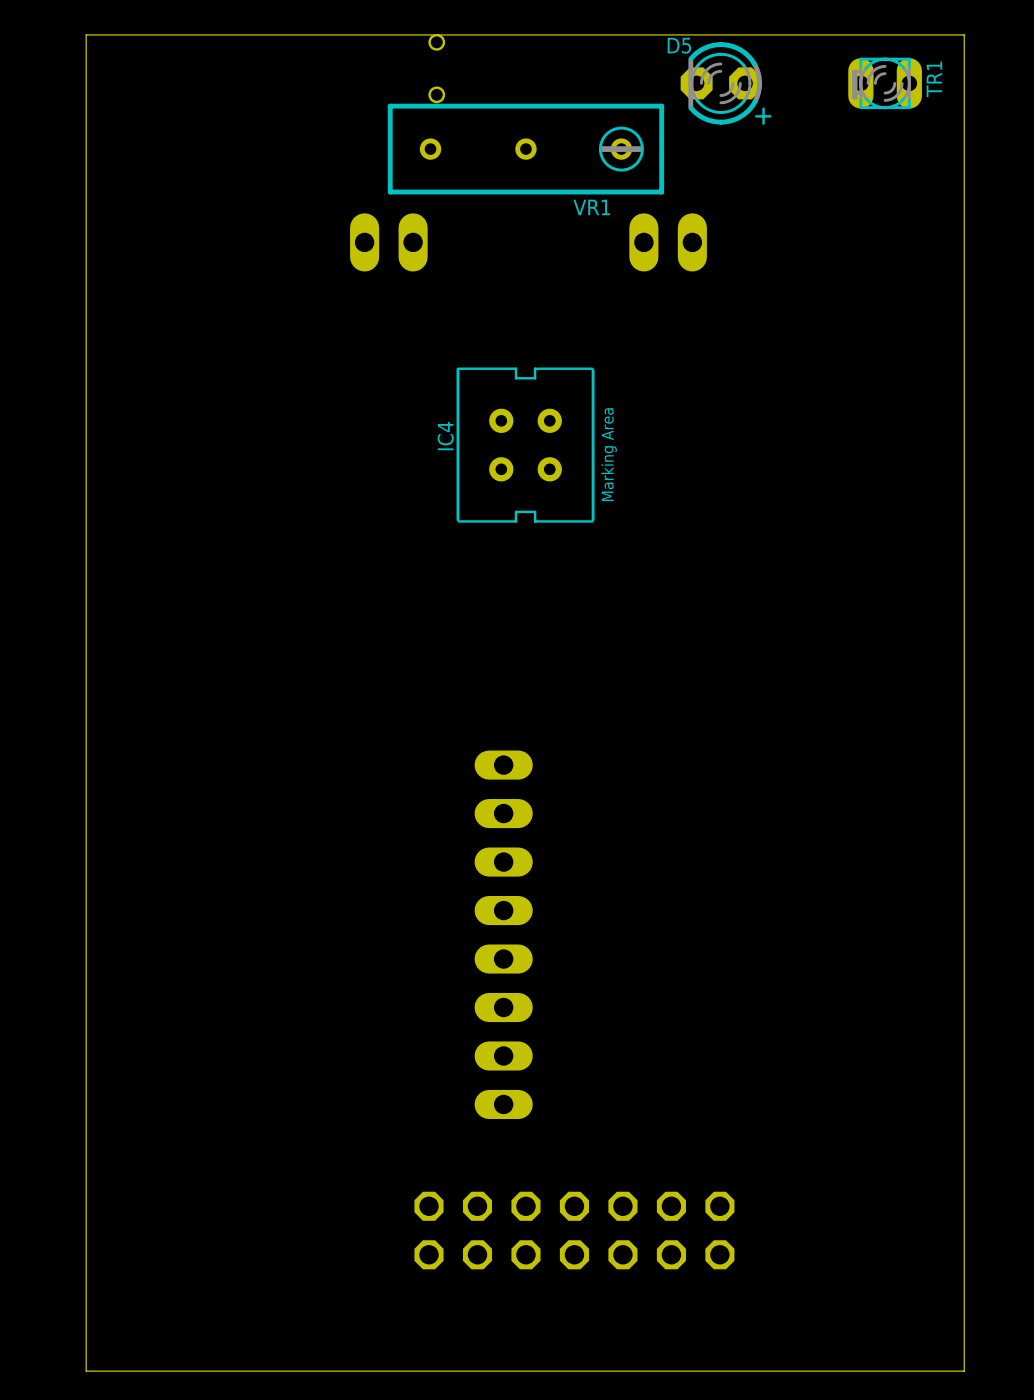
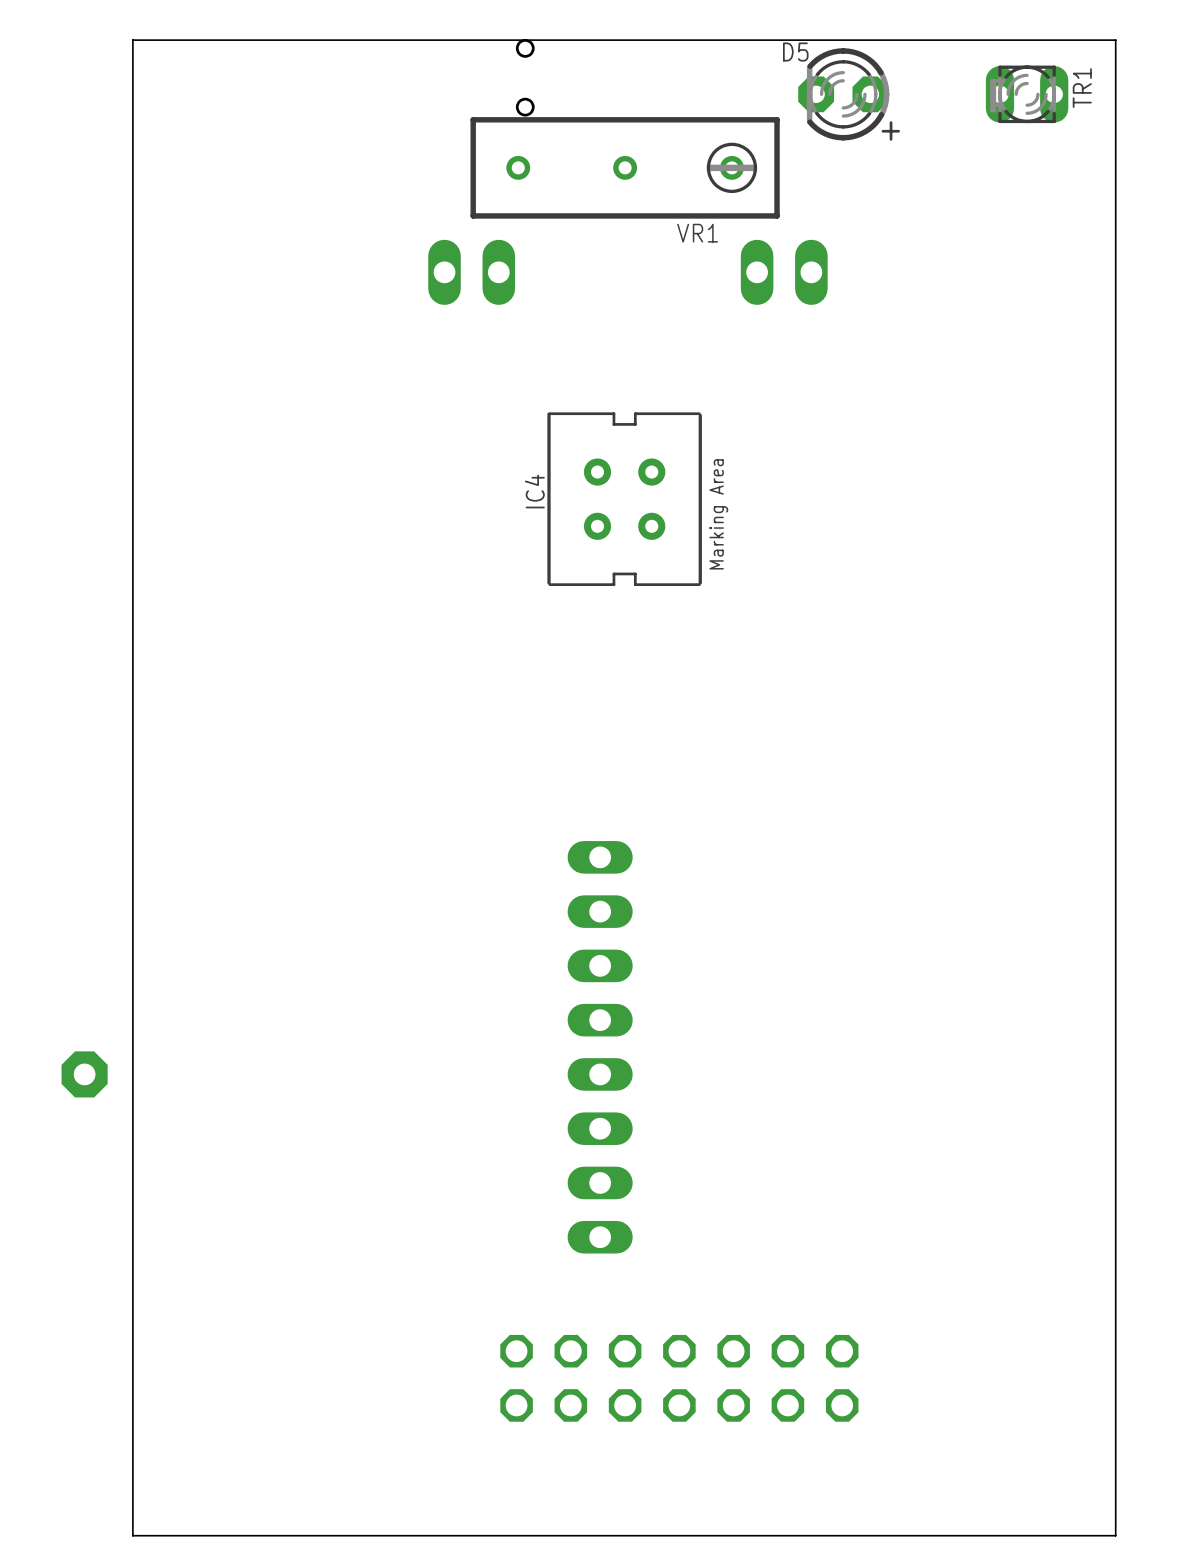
part: none -> (84, 1074)

